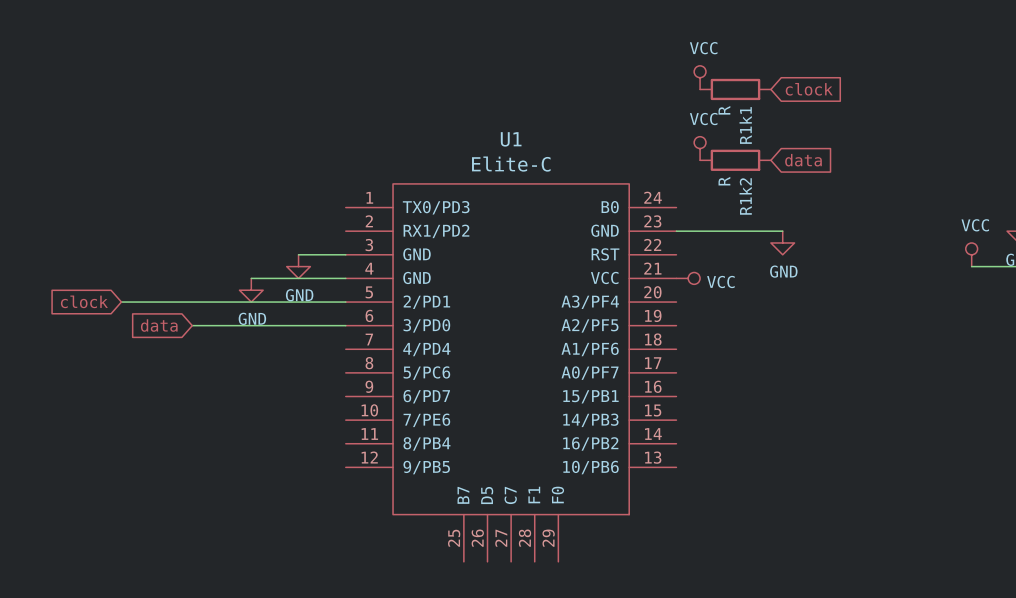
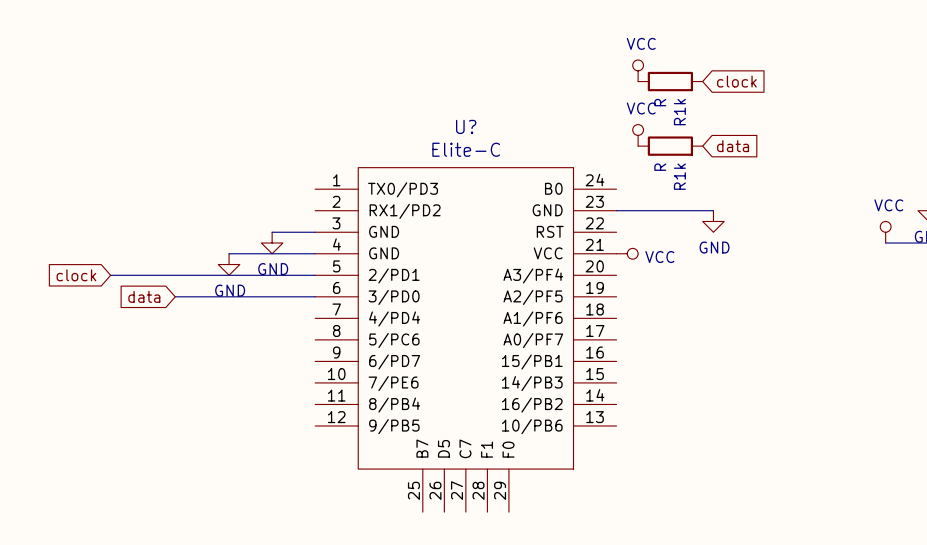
R1k1 name: R1k1 (745, 125) -> R1k (679, 112)
U1 name: U1 (511, 139) -> U? (466, 126)
R1k2 name: R1k2 (745, 196) -> R1k (679, 176)

